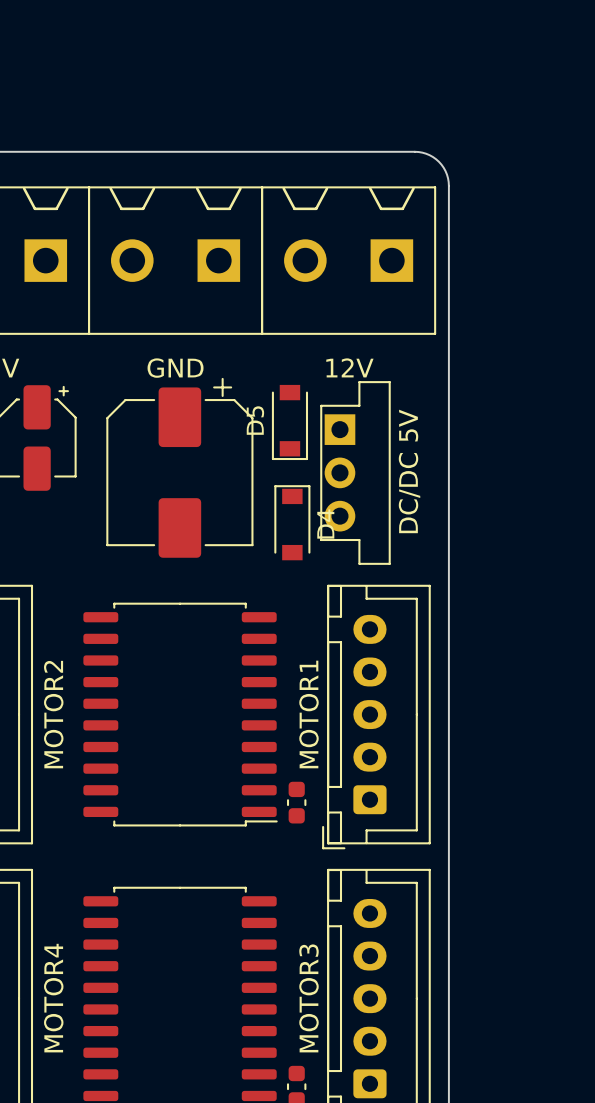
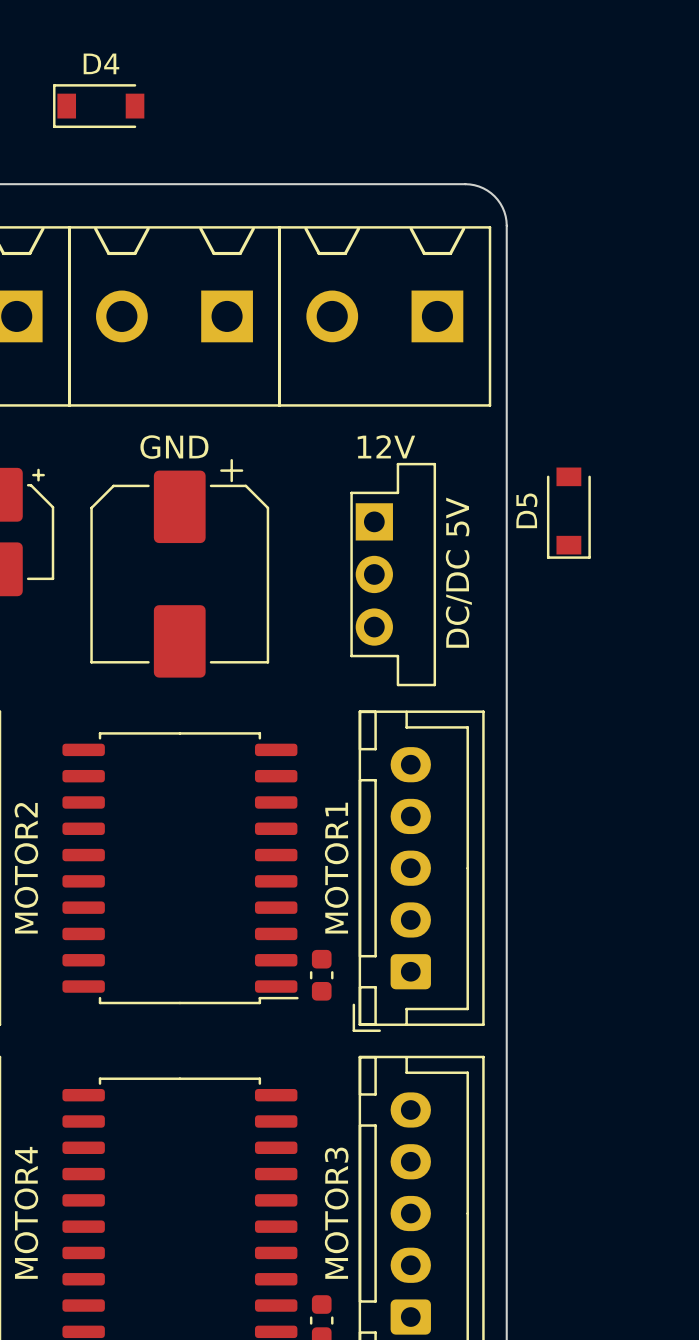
D5 position: (289, 422) -> (568, 513)
D4 rotation: 0° (292, 522) -> 90° counterclockwise (98, 106)
D4 position: (292, 522) -> (98, 106)

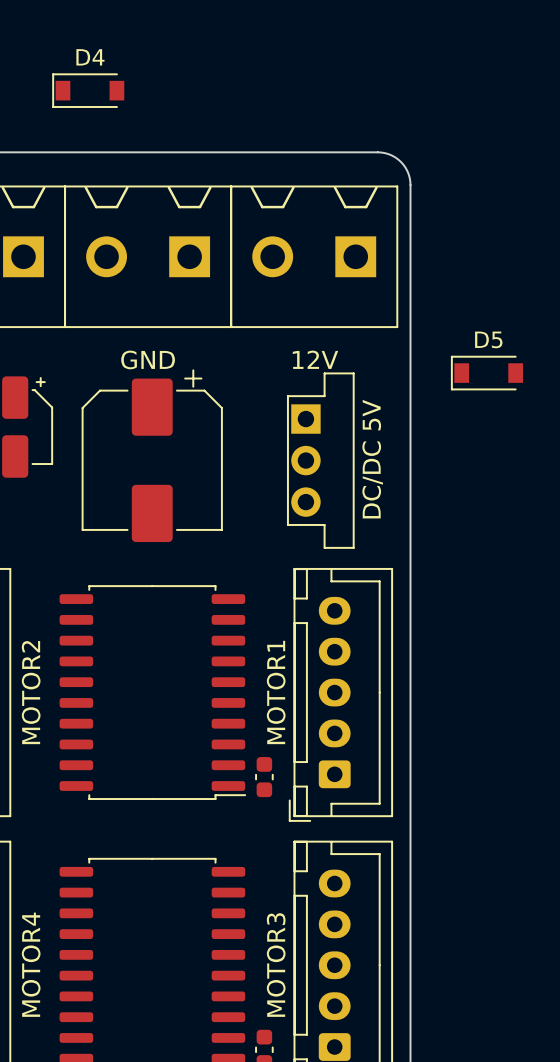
D5 rotation: 0° (568, 513) -> 90° clockwise (486, 373)
D5 position: (568, 513) -> (486, 373)

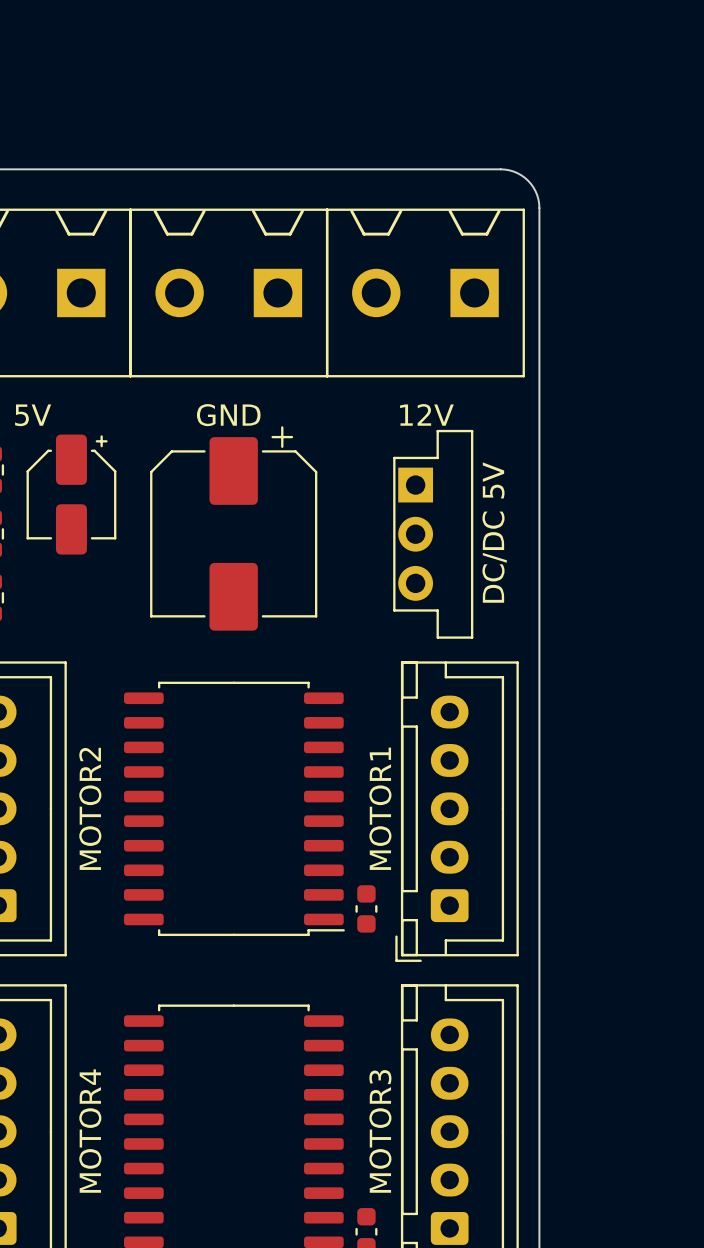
D4: (88, 90) -> none
D5: (486, 373) -> none

